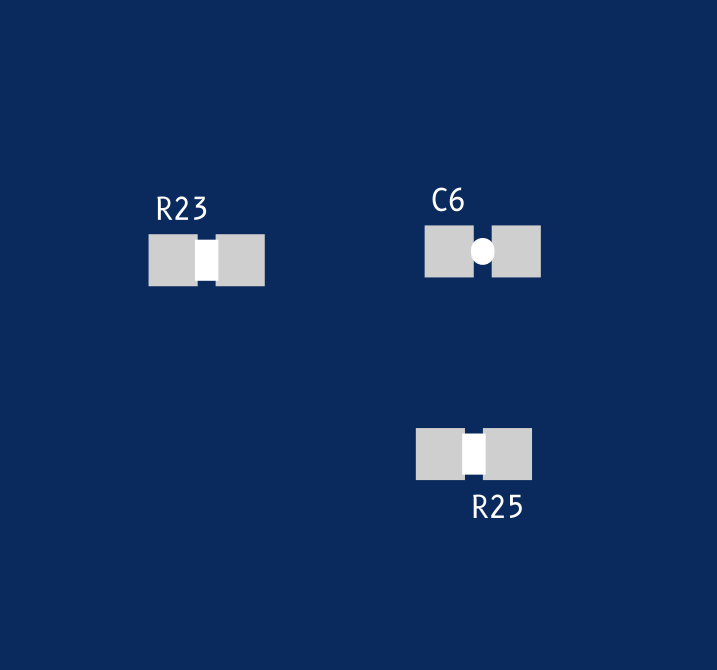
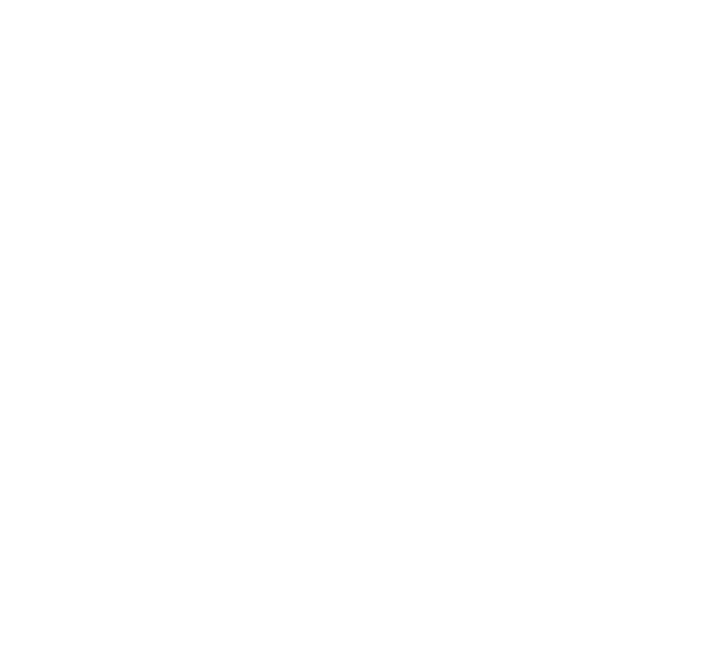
C6: (482, 251) -> none
R23: (206, 260) -> none
R25: (473, 454) -> none

